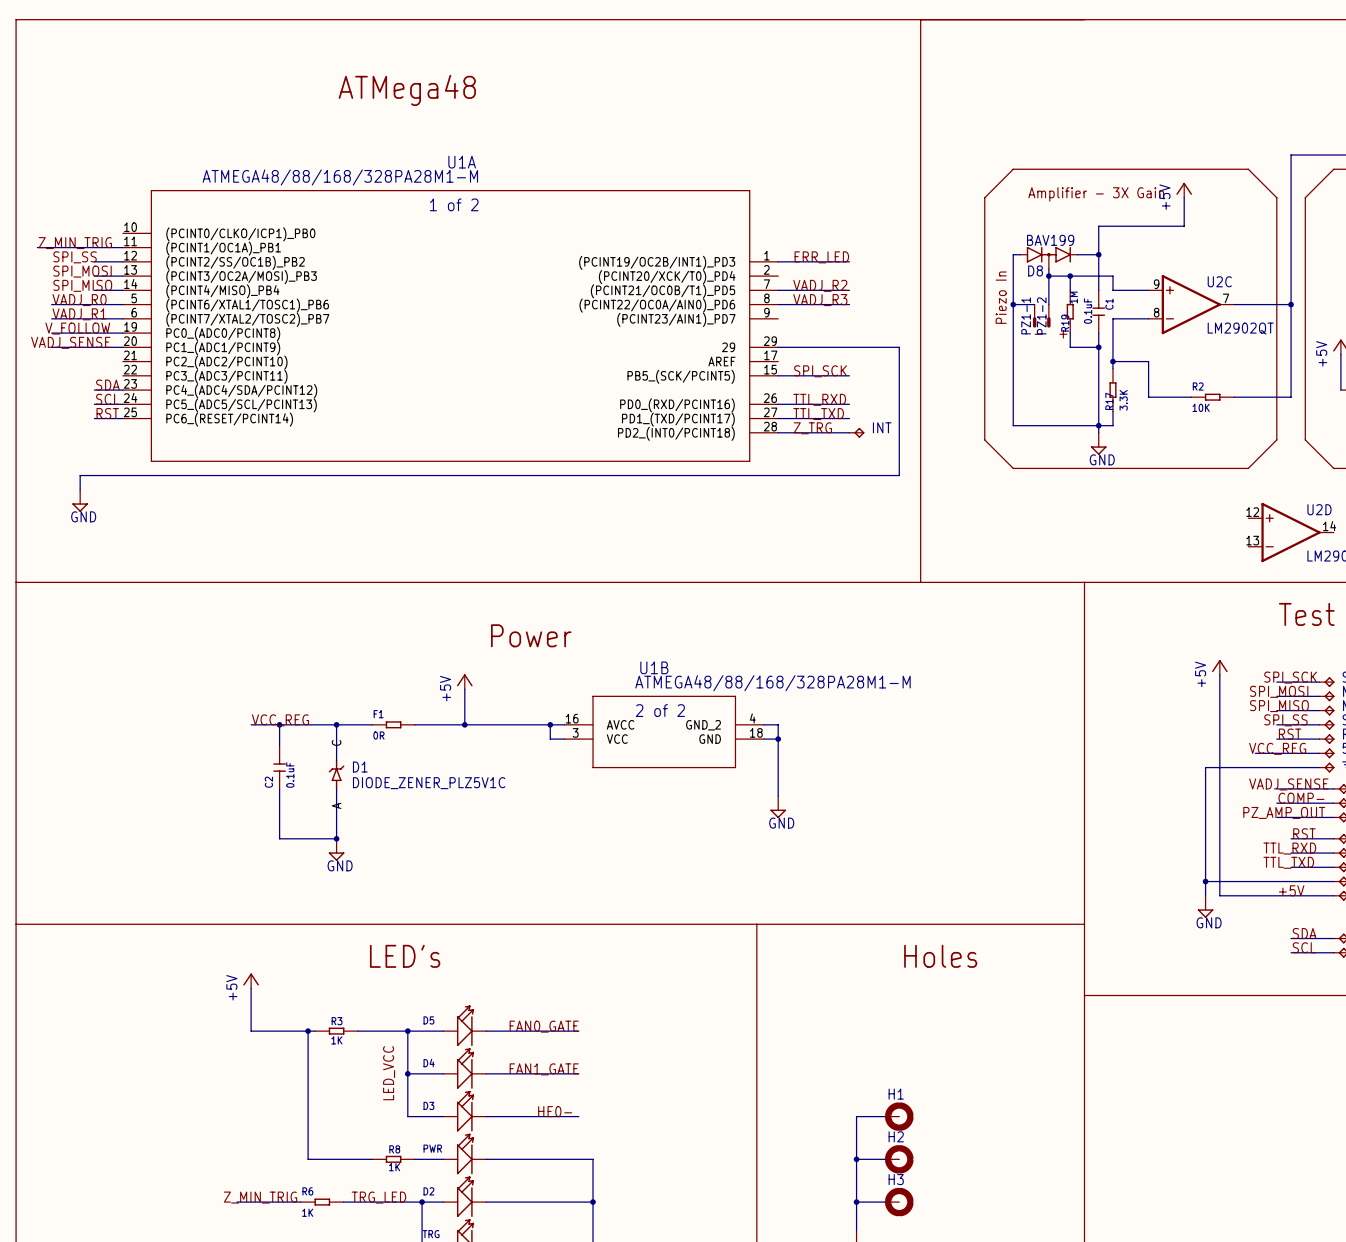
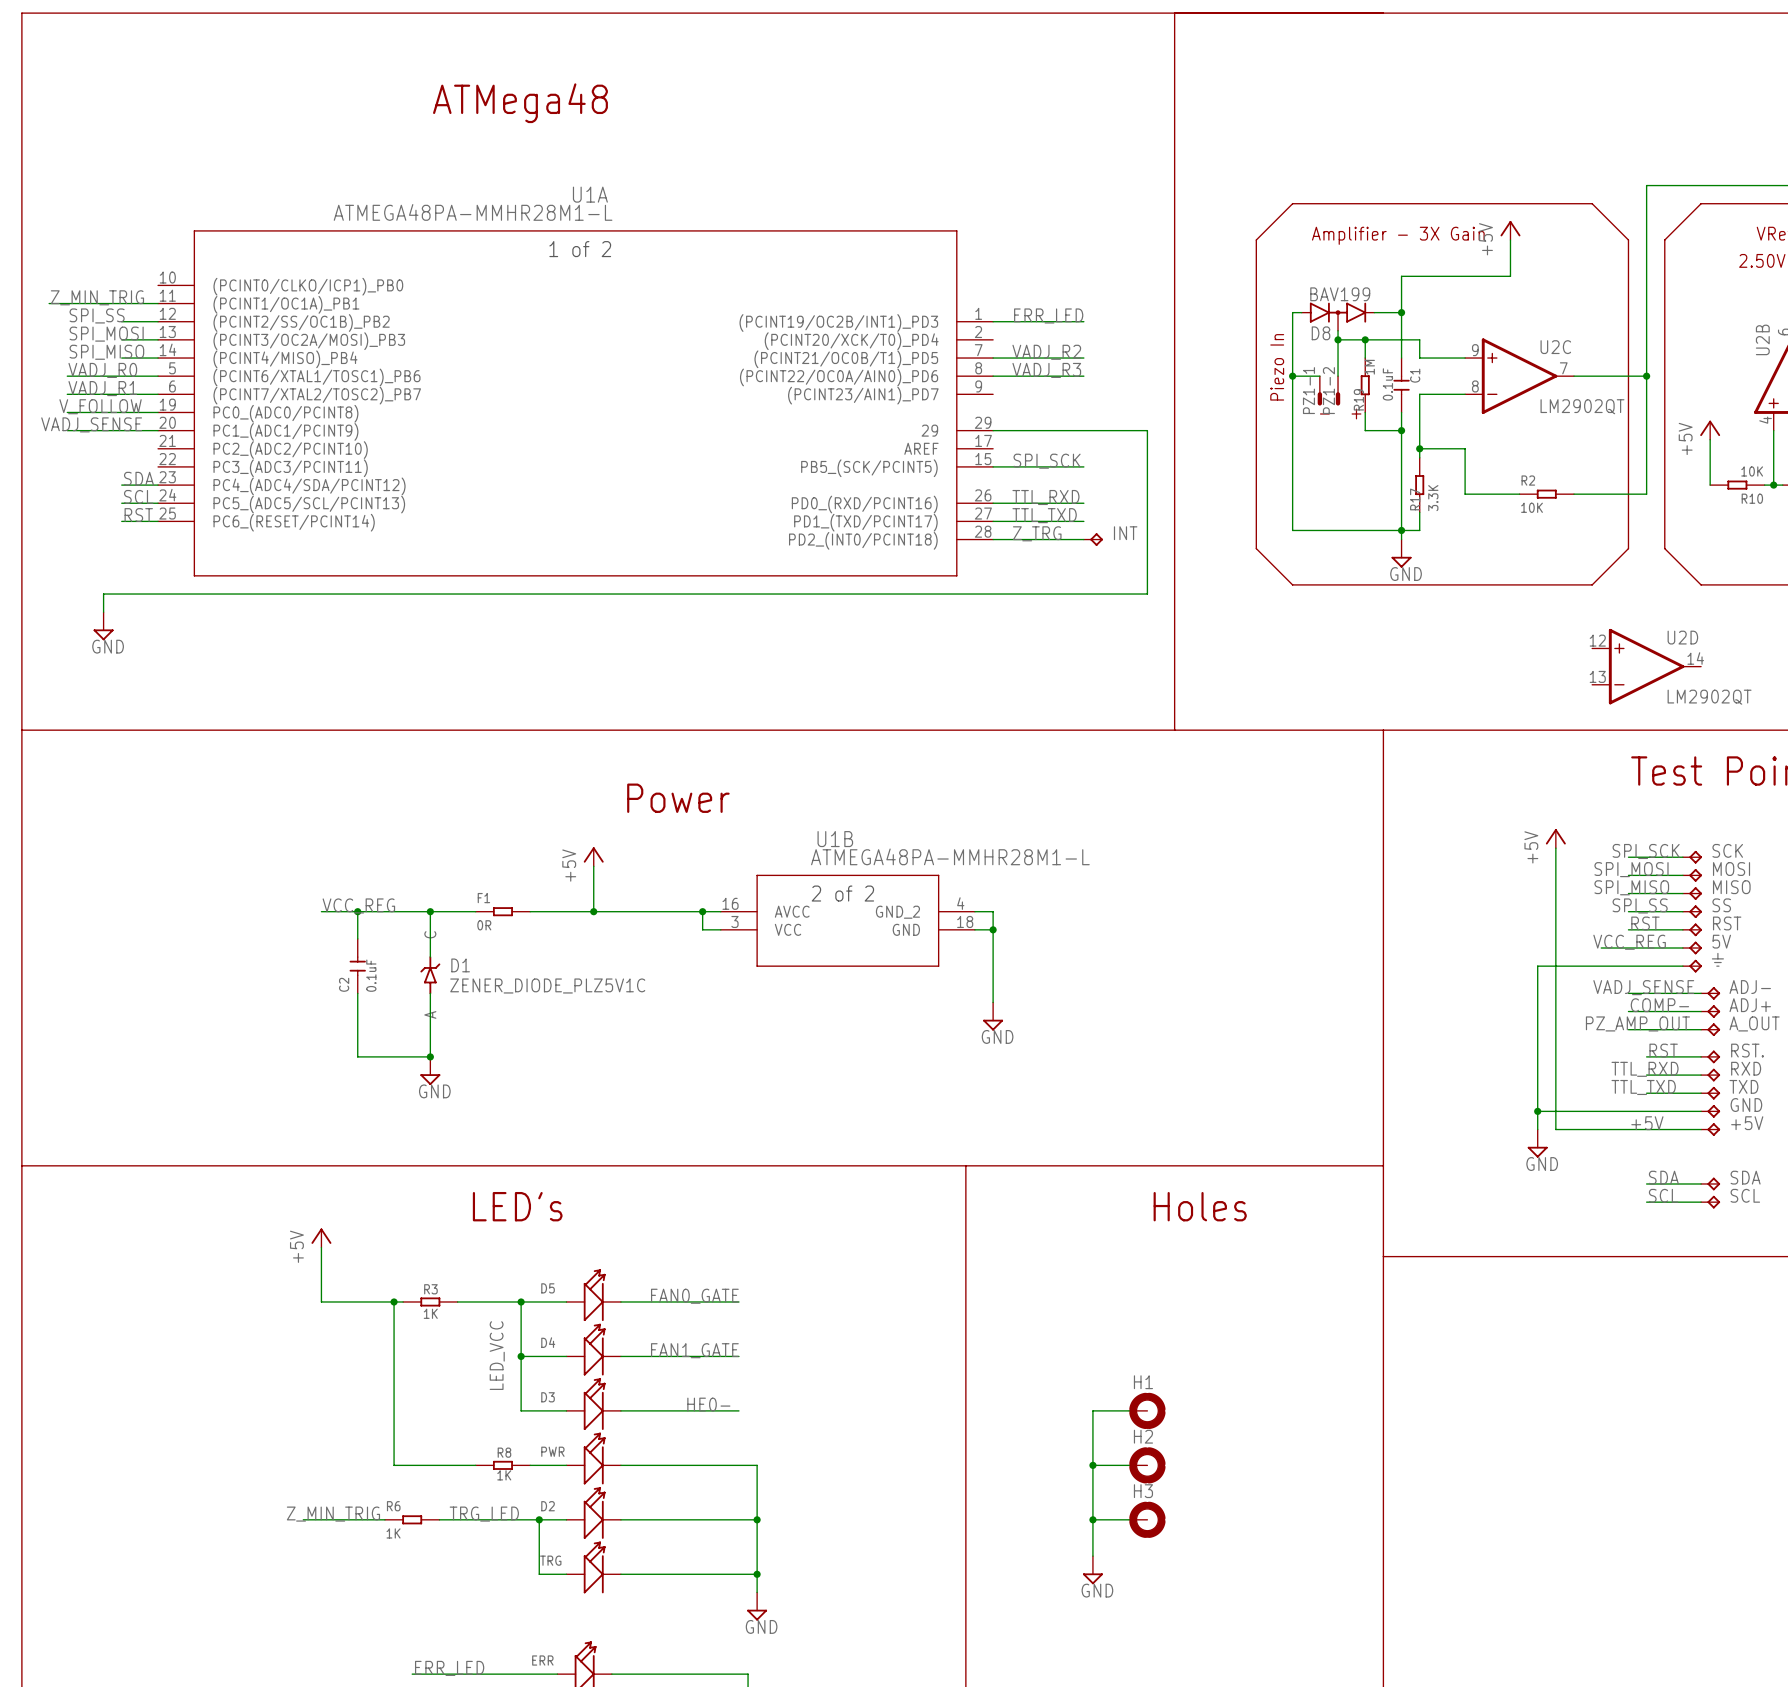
U1A value: ATMEGA48/88/168/328PA28M1-M (340, 177) -> ATMEGA48PA-MMHR28M1-L (473, 212)
U1B value: ATMEGA48/88/168/328PA28M1-M (772, 683) -> ATMEGA48PA-MMHR28M1-L (950, 856)
D1 value: DIODE_ZENER_PLZ5V1C (429, 783) -> ZENER_DIODE_PLZ5V1C (547, 986)

